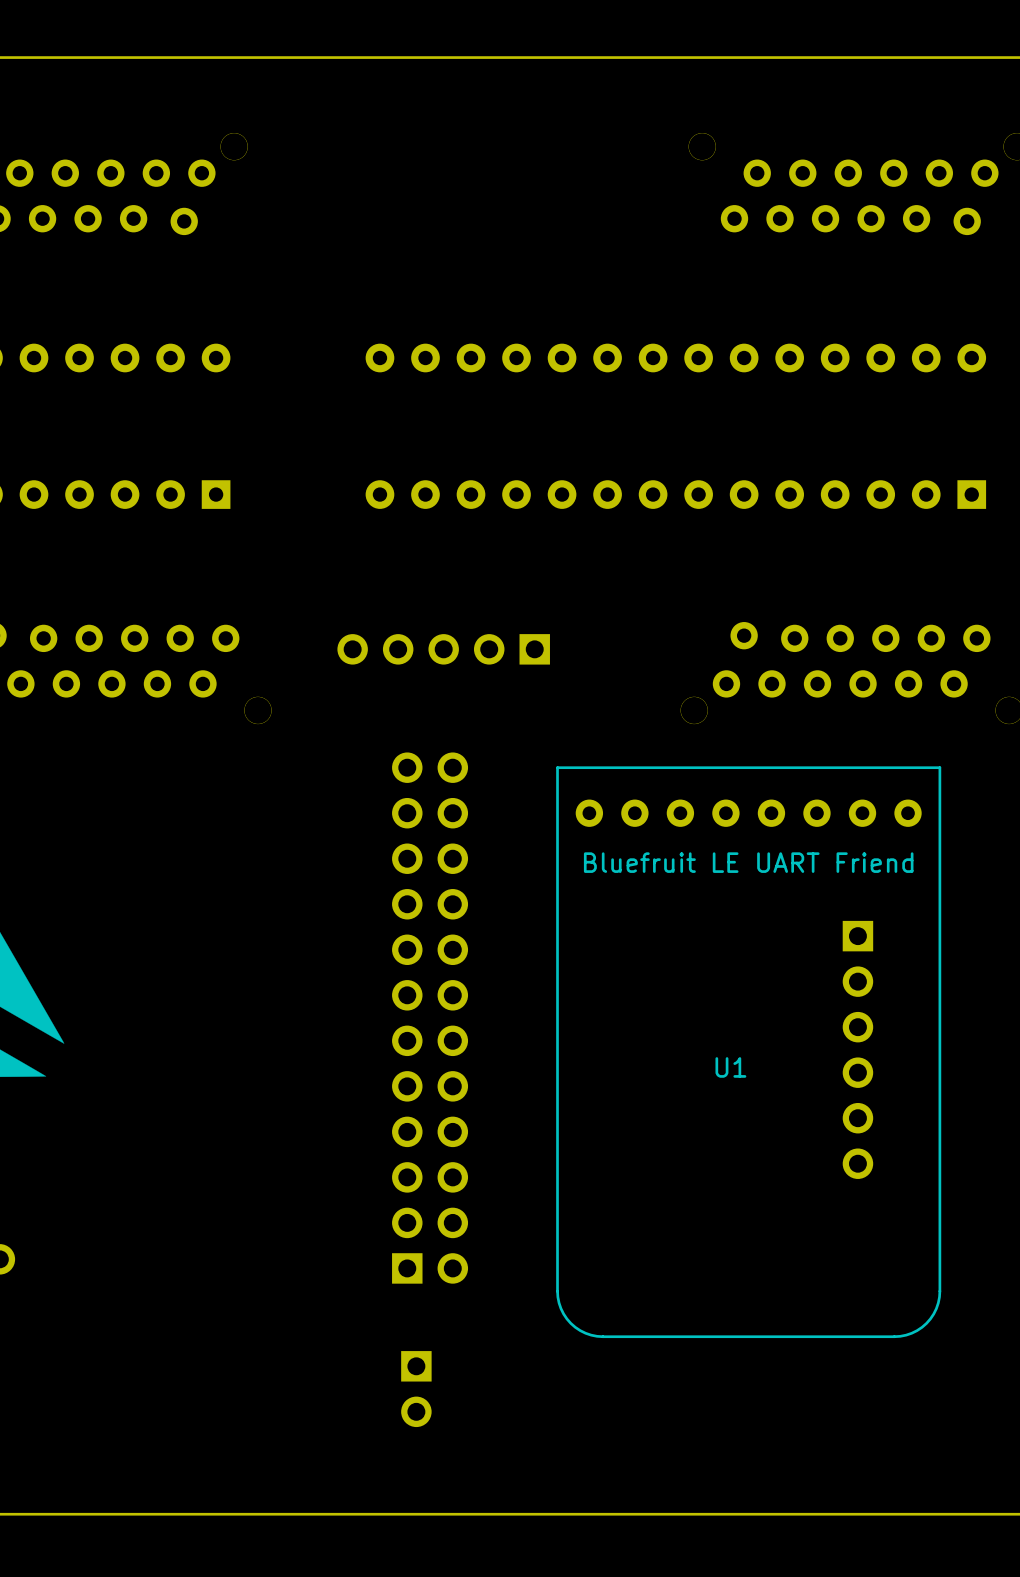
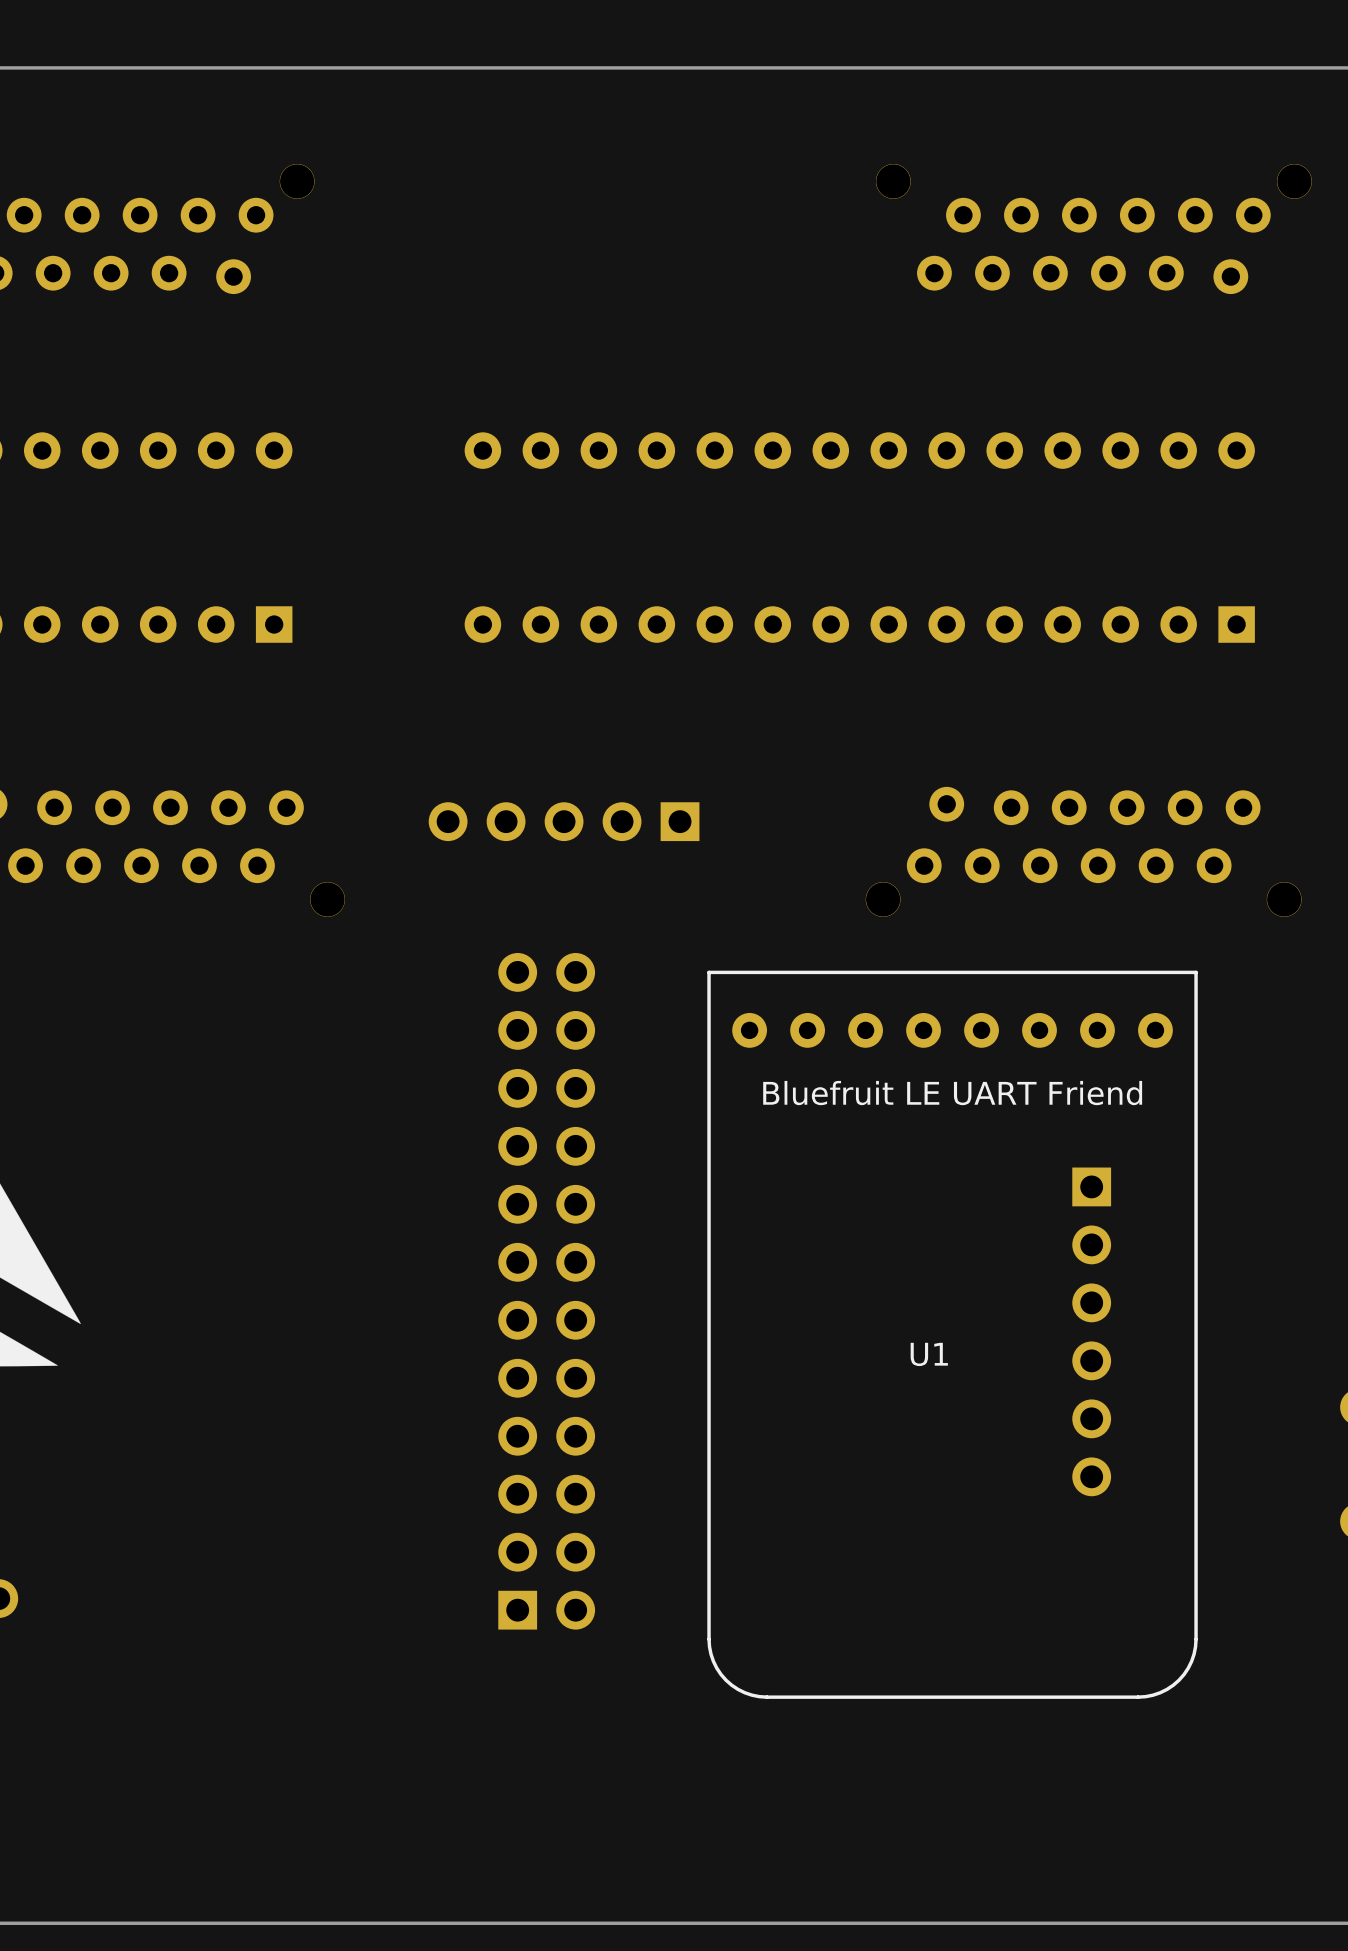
part: (416, 1389) -> none

